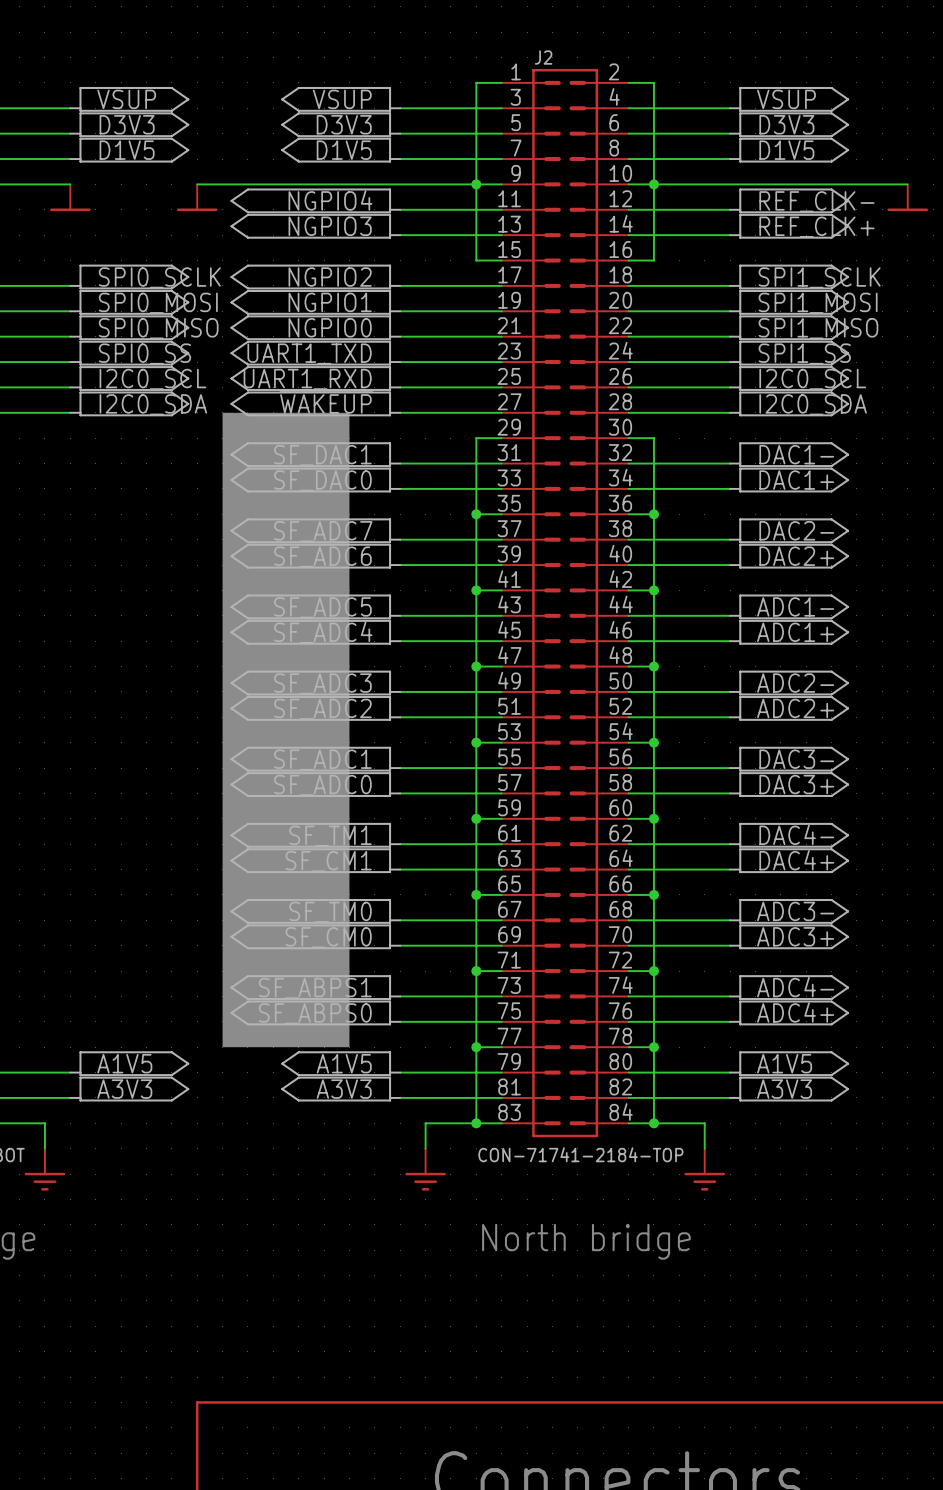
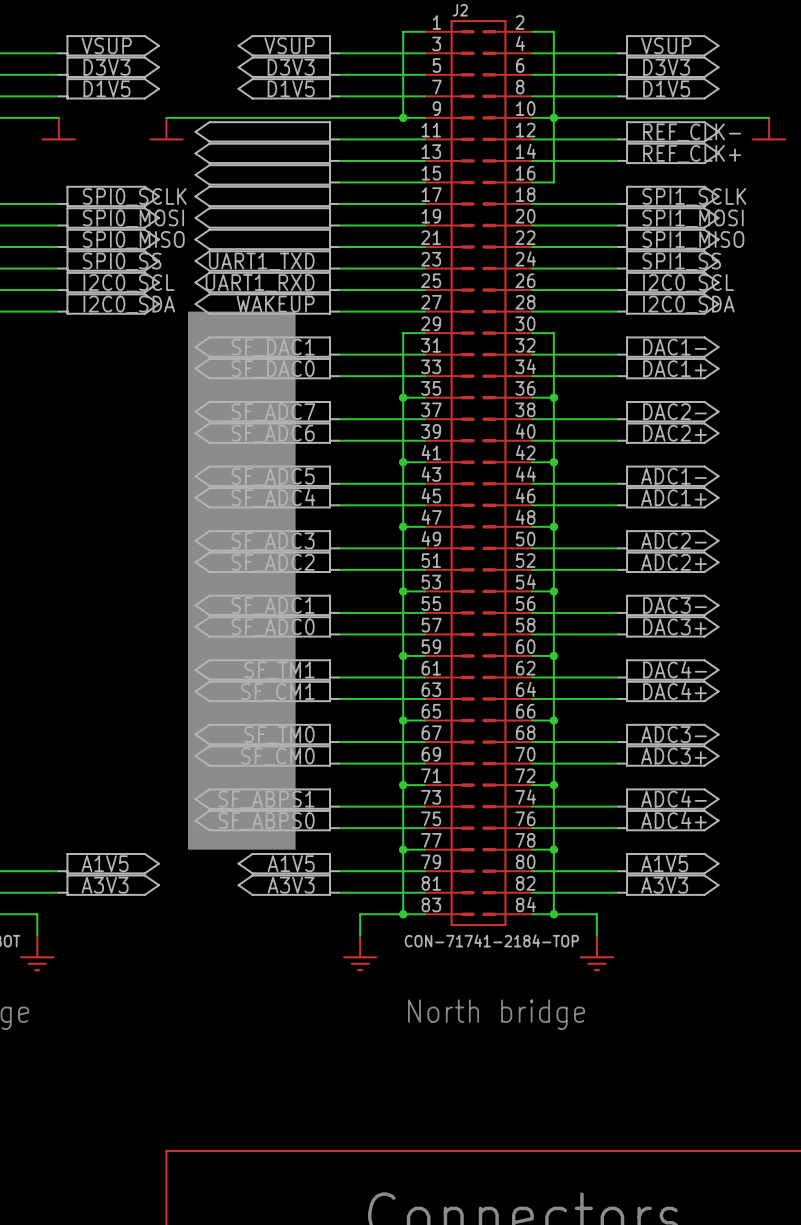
wire: (476, 184) (476, 260) -> (338, 182) (403, 182)
label: NGPIO4 (330, 200) -> none
label: NGPIO3 (330, 226) -> none
part: none -> (266, 174)
label: NGPIO2 (330, 277) -> none
label: NGPIO1 (330, 302) -> none
label: NGPIO0 (330, 327) -> none

